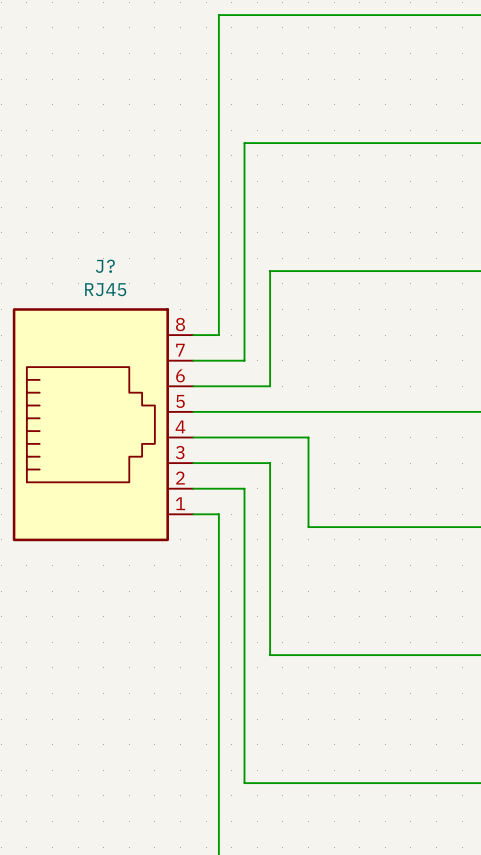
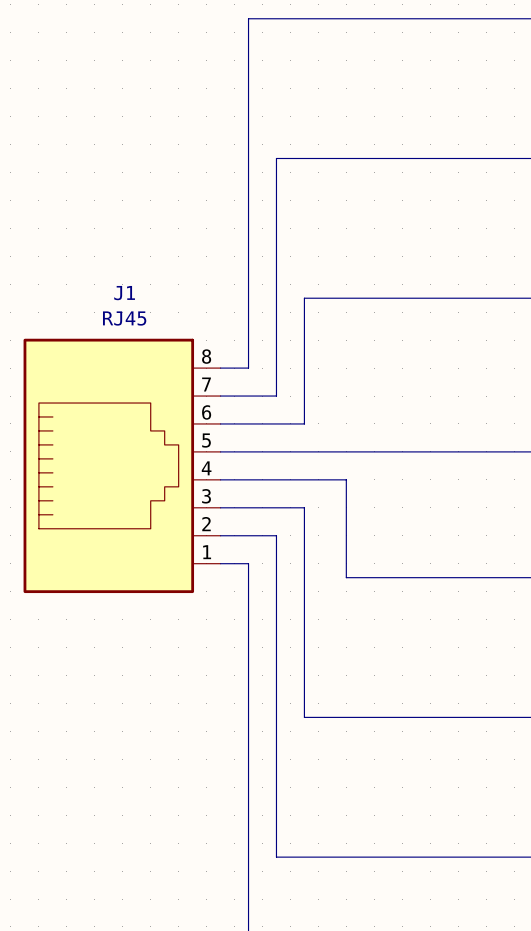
J? name: J? (105, 266) -> J1 (124, 293)

